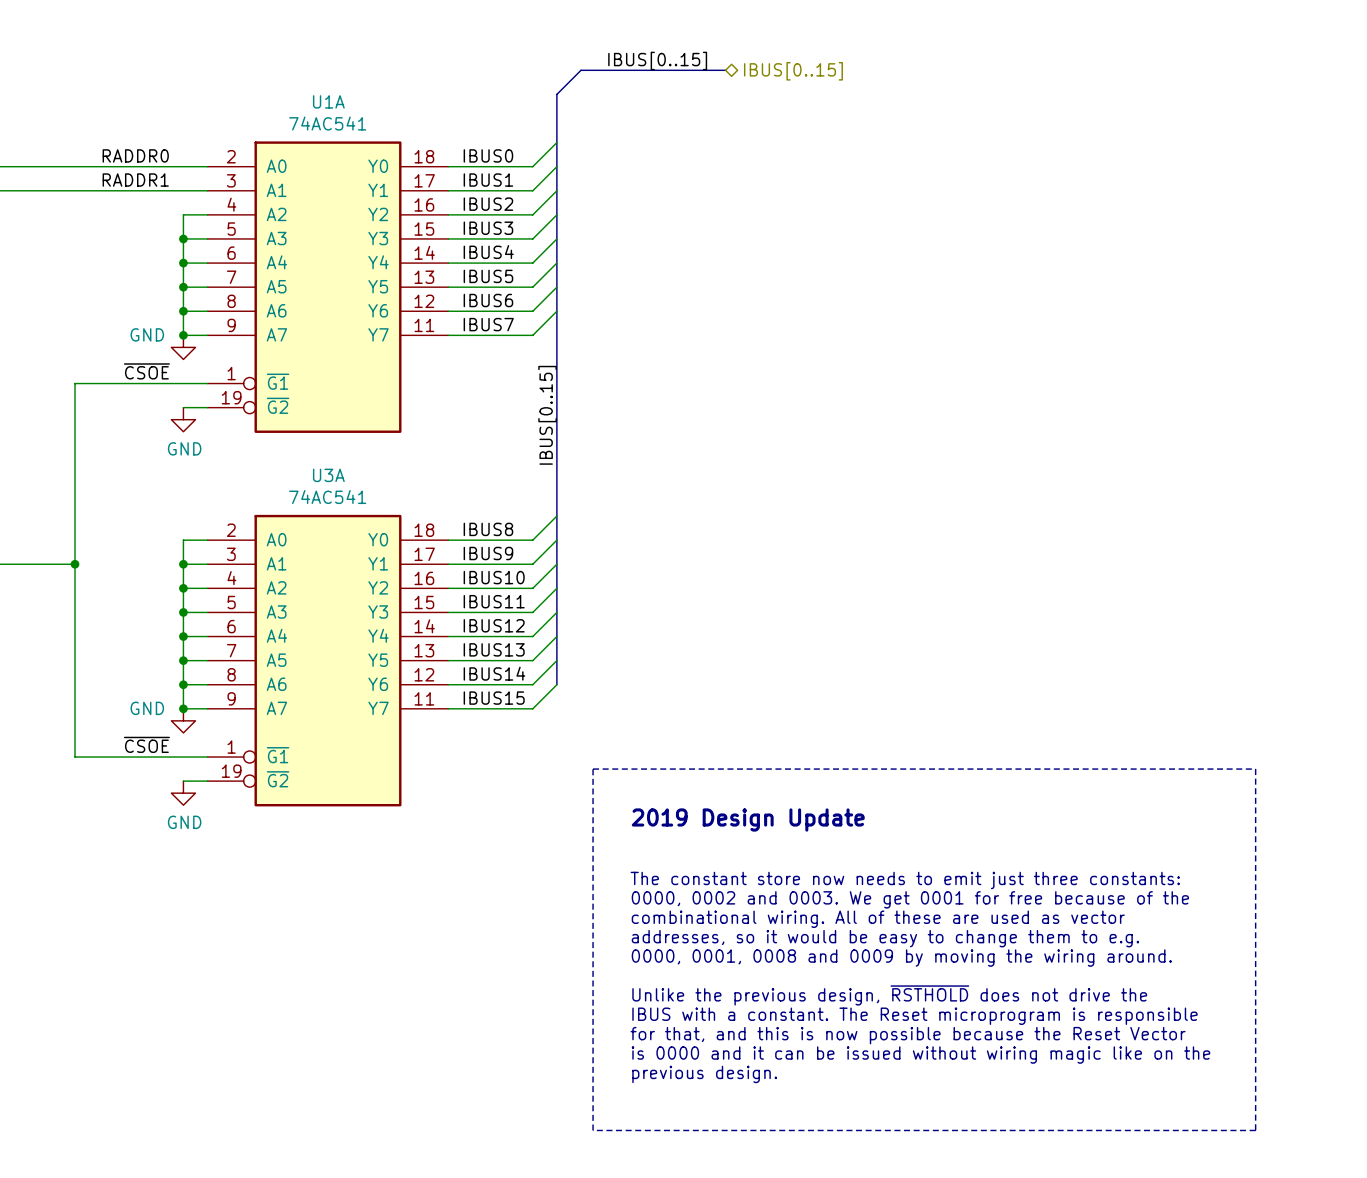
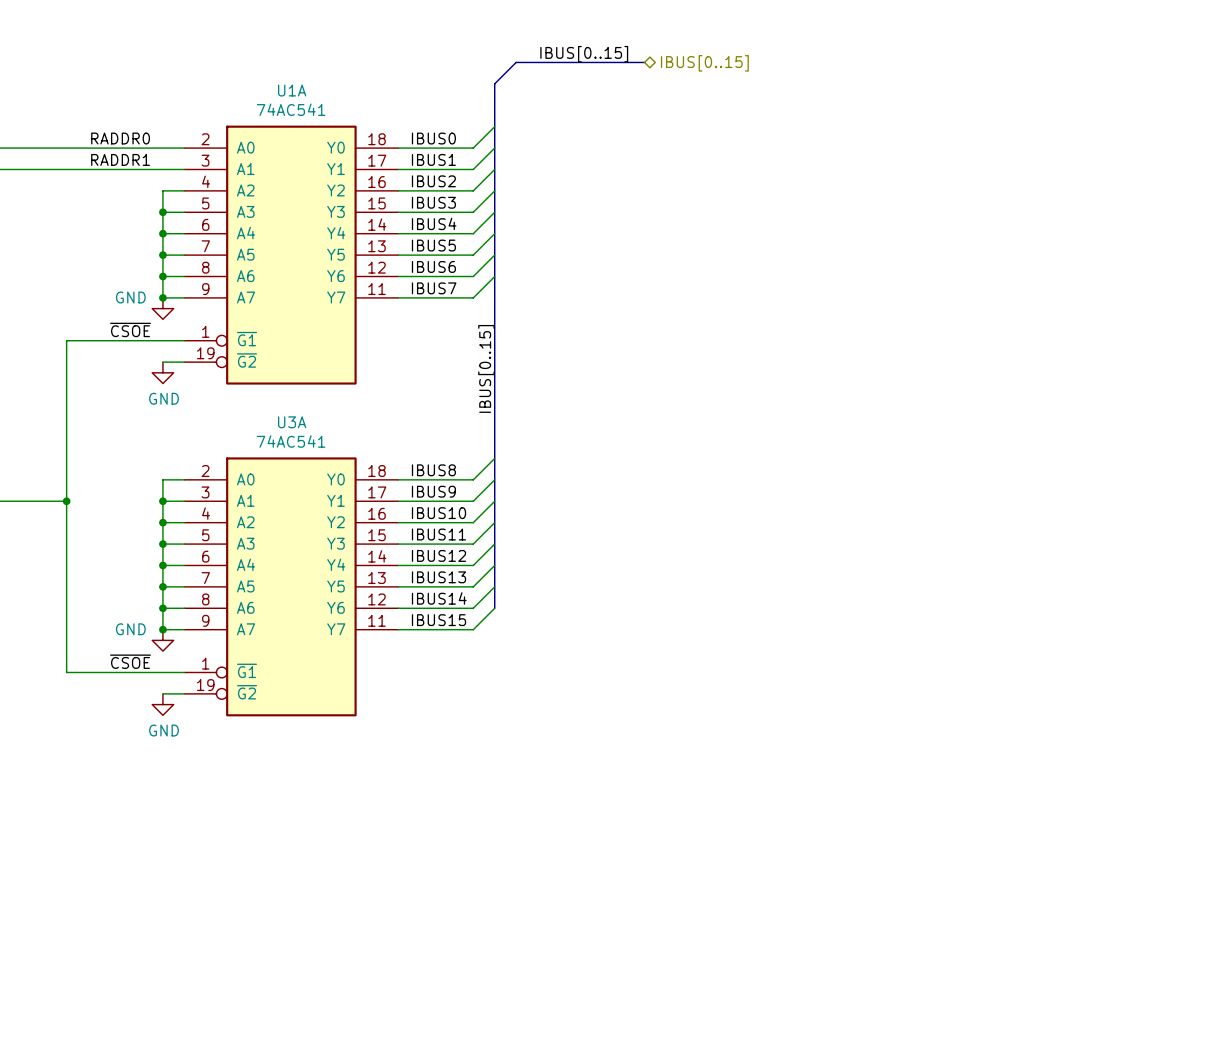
line: (593, 769) (593, 1130) (1255, 1130) (1255, 769) (593, 769) -> none
text: 2019 Design Update (748, 820) -> none
text: The constant store now needs to emit just three constants: (905, 880) -> none
text: 0000, 0002 and 0003. We get 0001 for free because of the (910, 899) -> none
text: combinational wiring. All of these are used as vector (878, 919) -> none
text: addresses, so it would be easy to change them to e.g. (885, 938) -> none
text: 0000, 0001, 0008 and 0009 by moving the wiring around. (901, 958) -> none
text: Unlike the previous design, ~{RSTHOLD} does not drive the (889, 995) -> none
text: IBUS with a constant. The Reset microprogram is responsible (914, 1016) -> none
text: for that, and this is now possible because the Reset Vector (908, 1035) -> none
text: is 0000 and it can be issued without wiring magic like on the (920, 1055) -> none
text: previous design. (704, 1074) -> none

